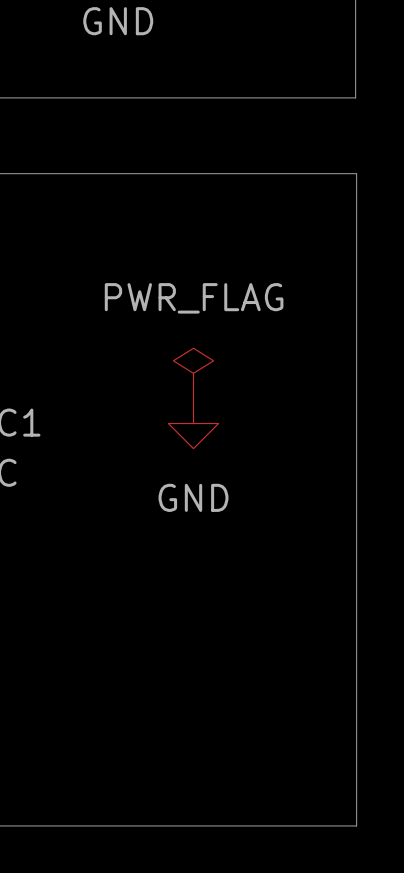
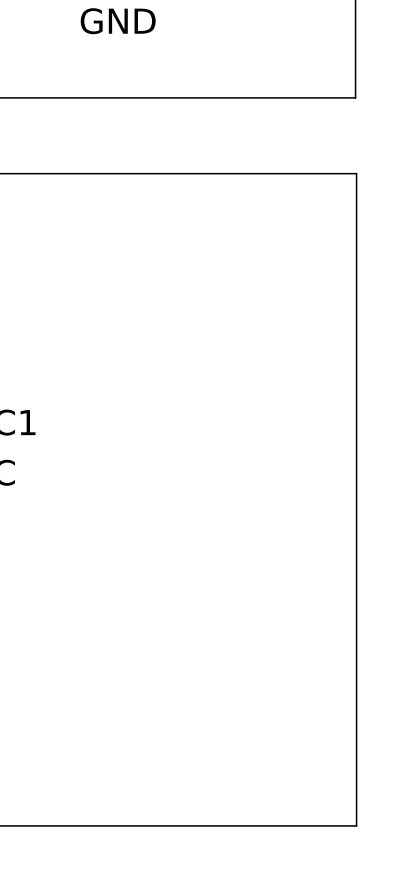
power symbol: PWR_FLAG (193, 373) -> none
power symbol: GND (193, 423) -> none

